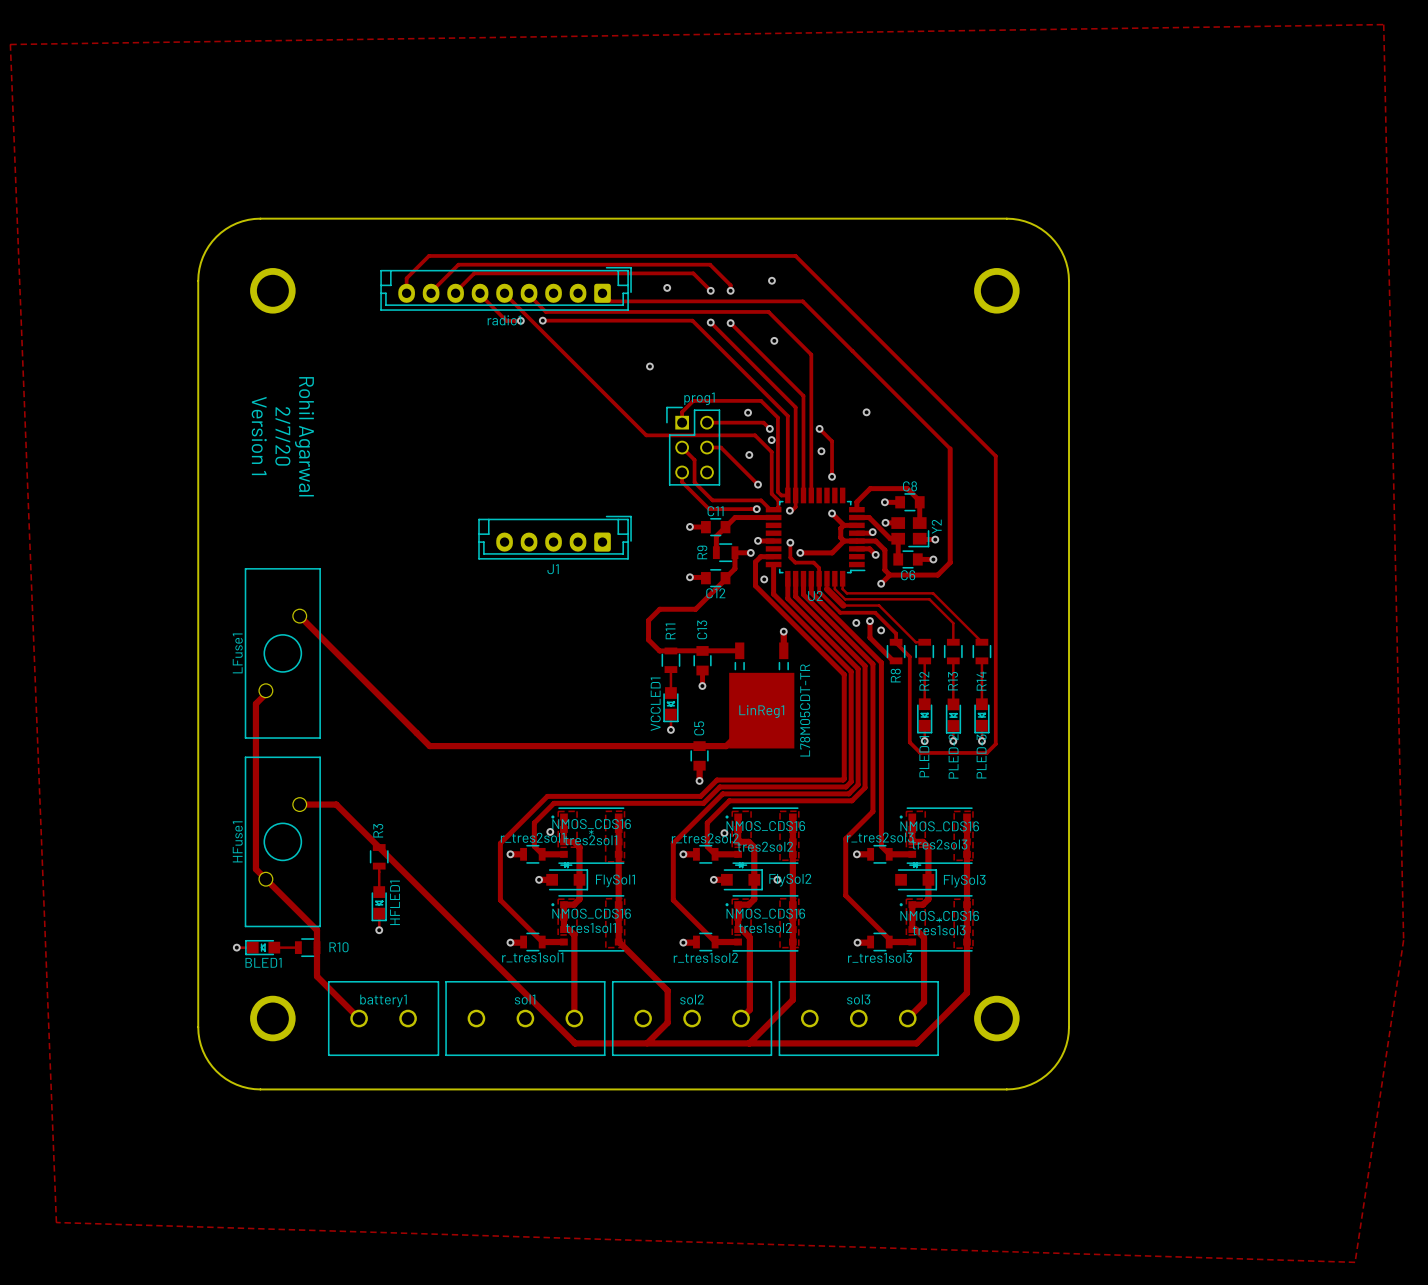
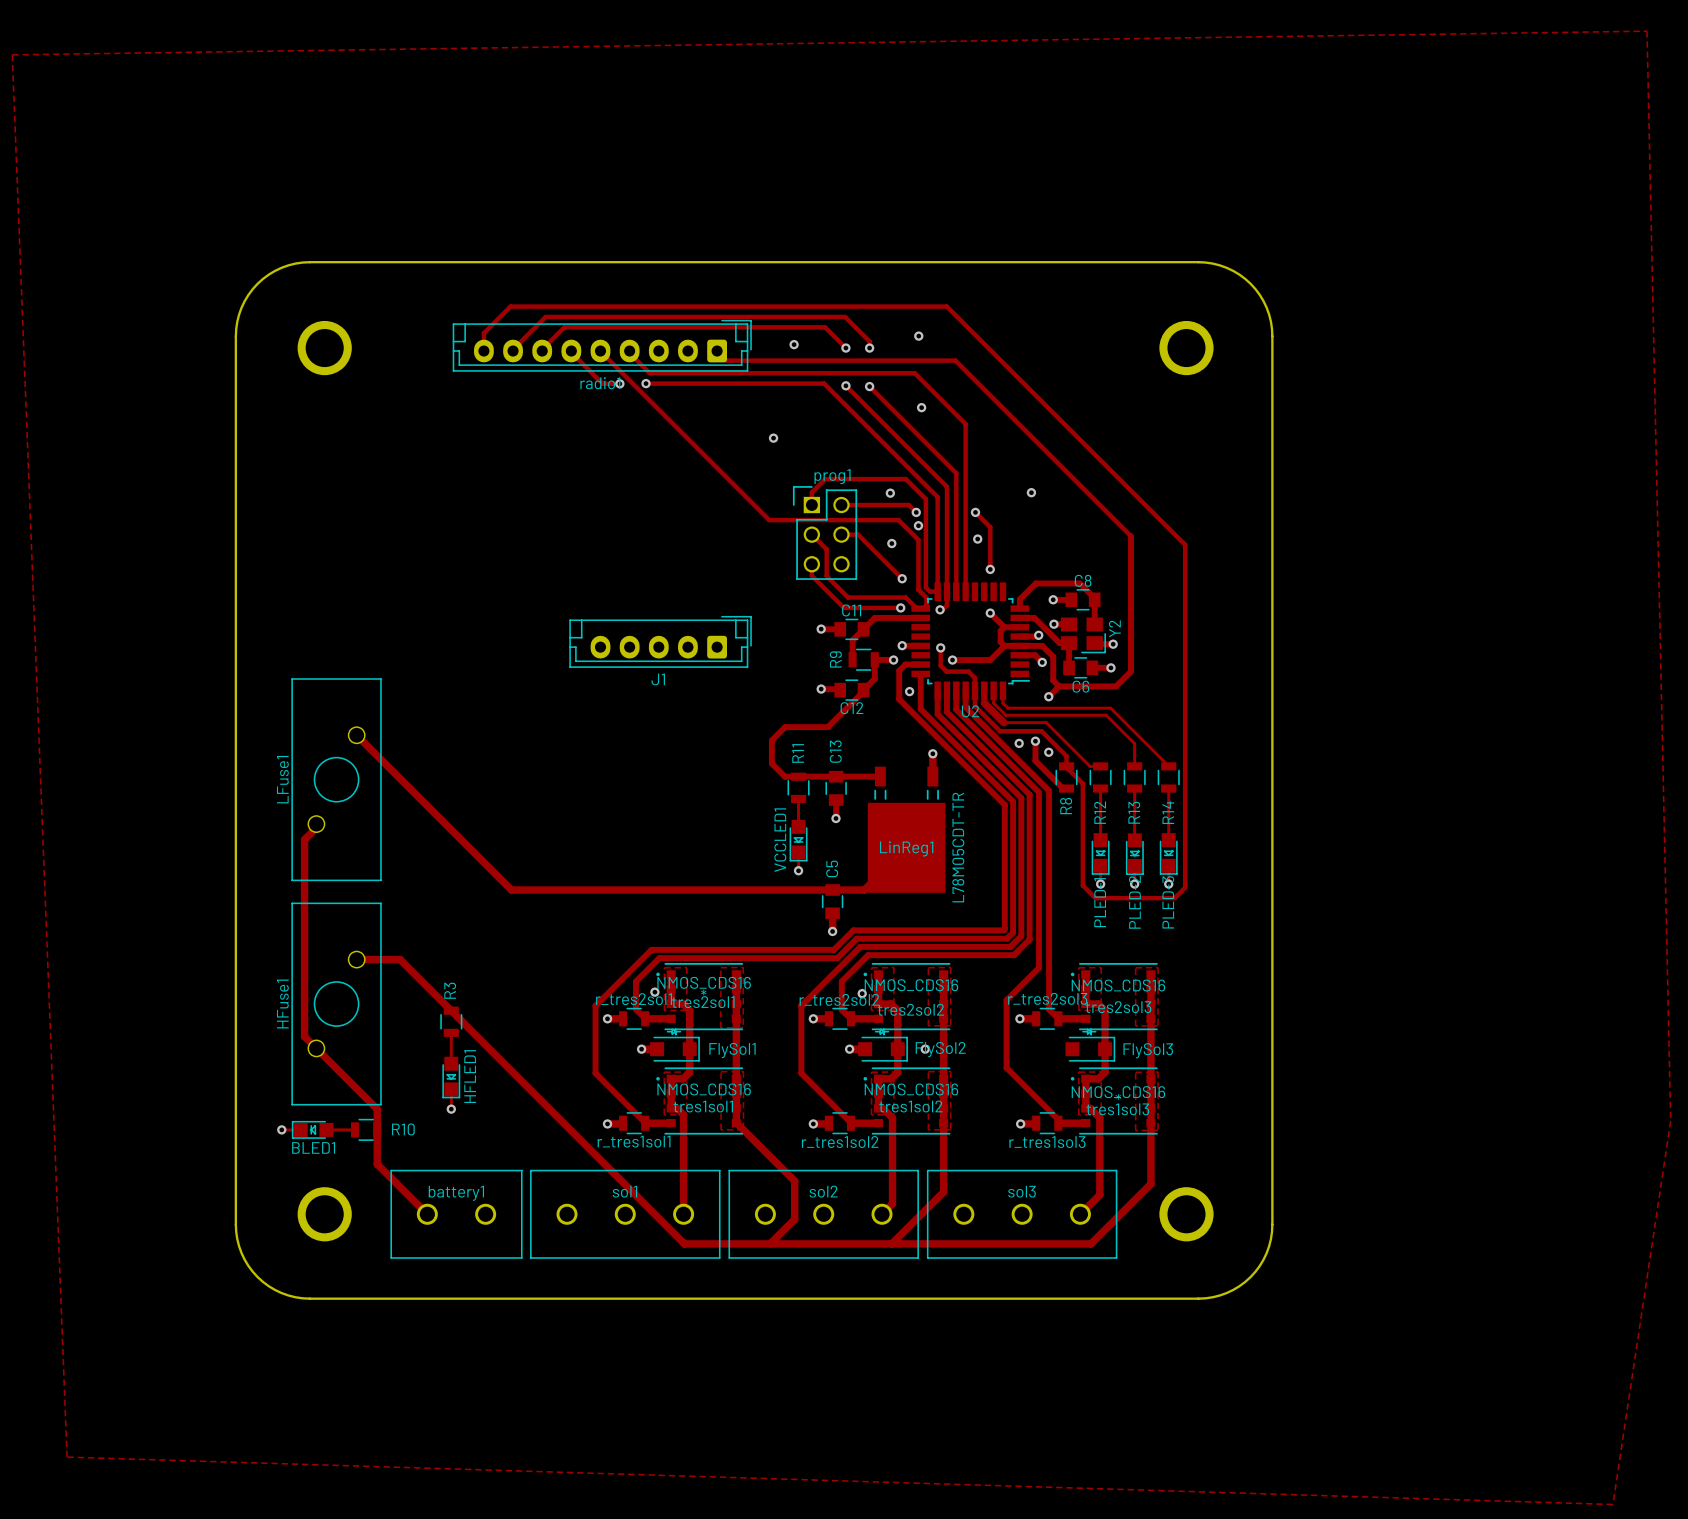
text: Version 1 (259, 435) -> none
text: 2/7/20 (282, 436) -> none
text: Rohil Agarwal (304, 436) -> none

